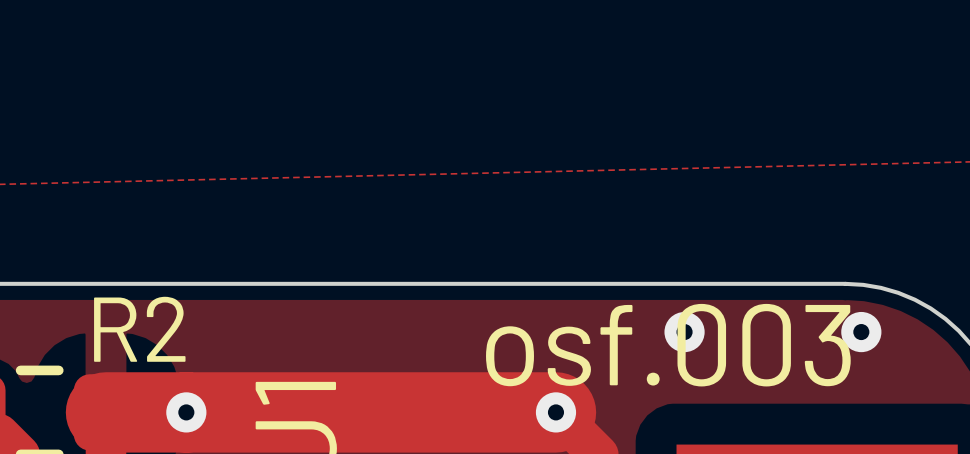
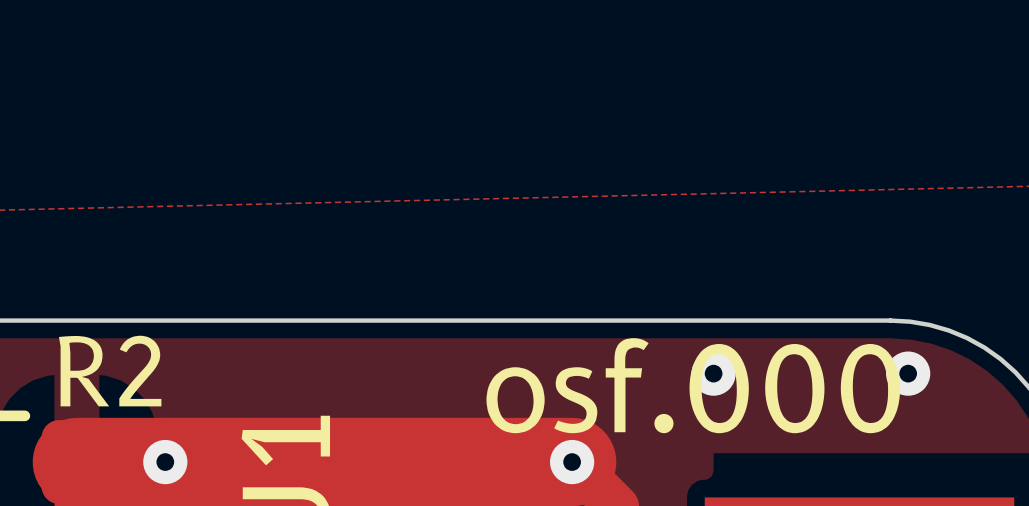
text: osf.003 (668, 345) -> osf.000 (693, 385)

